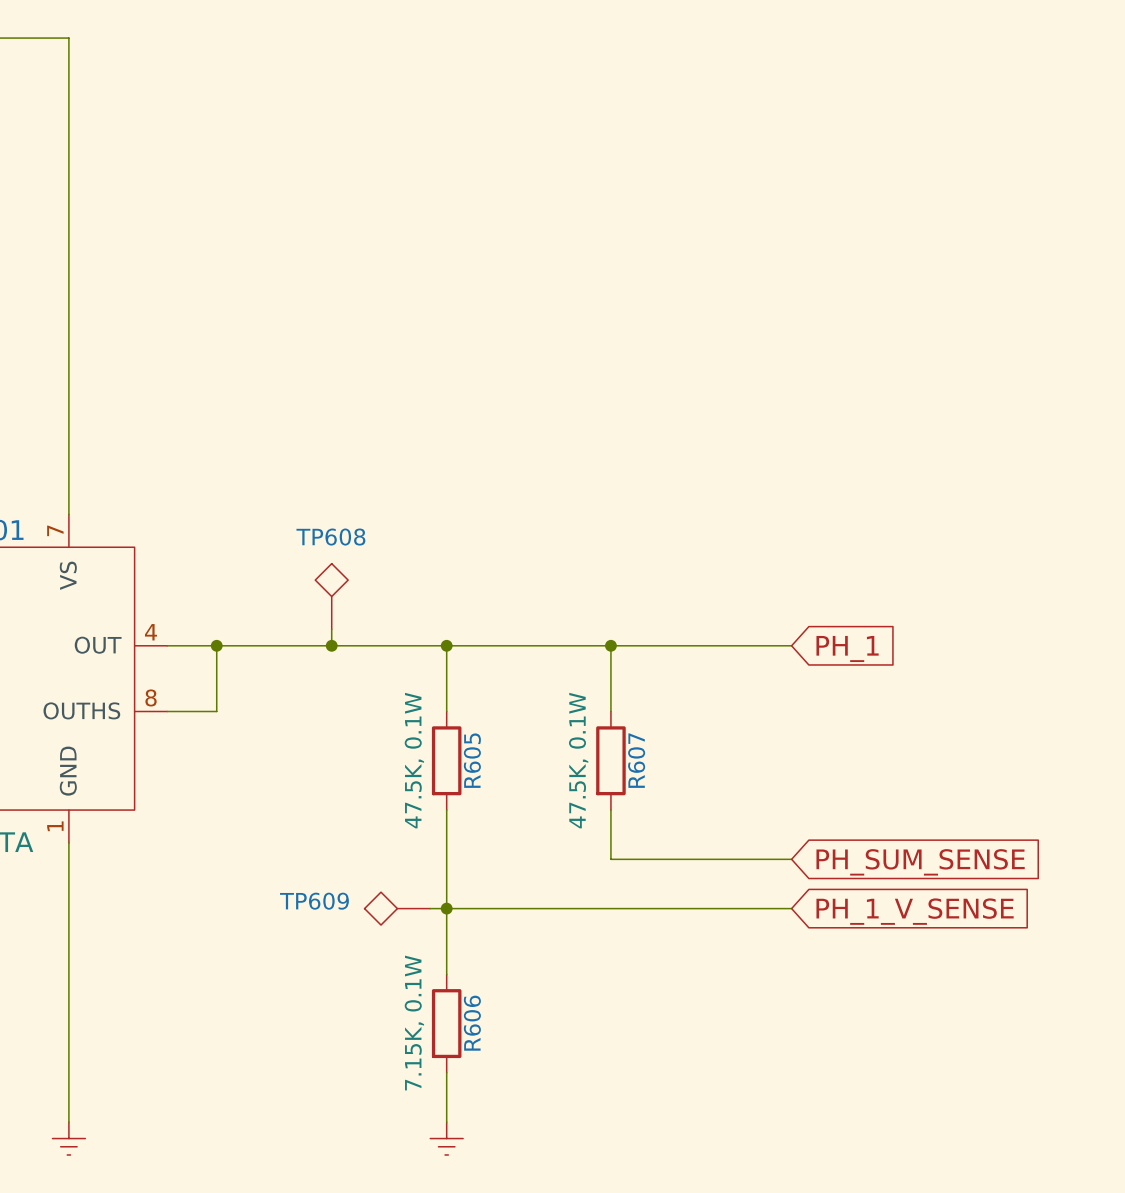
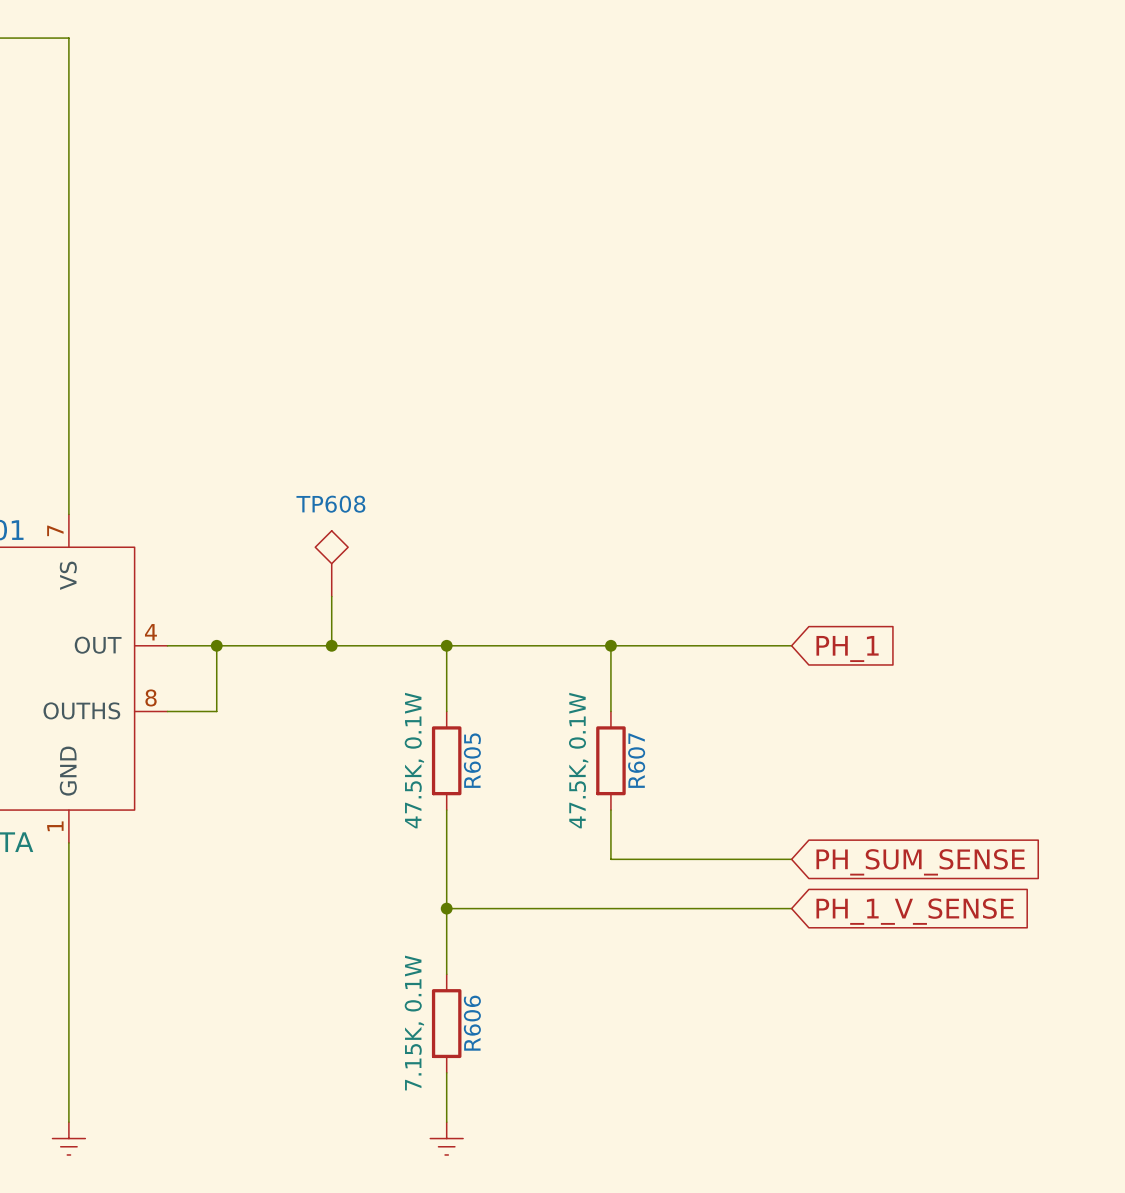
TP608 position: (331, 596) -> (331, 563)
TP609: (397, 908) -> none
wire: (430, 908) (446, 908) -> none

